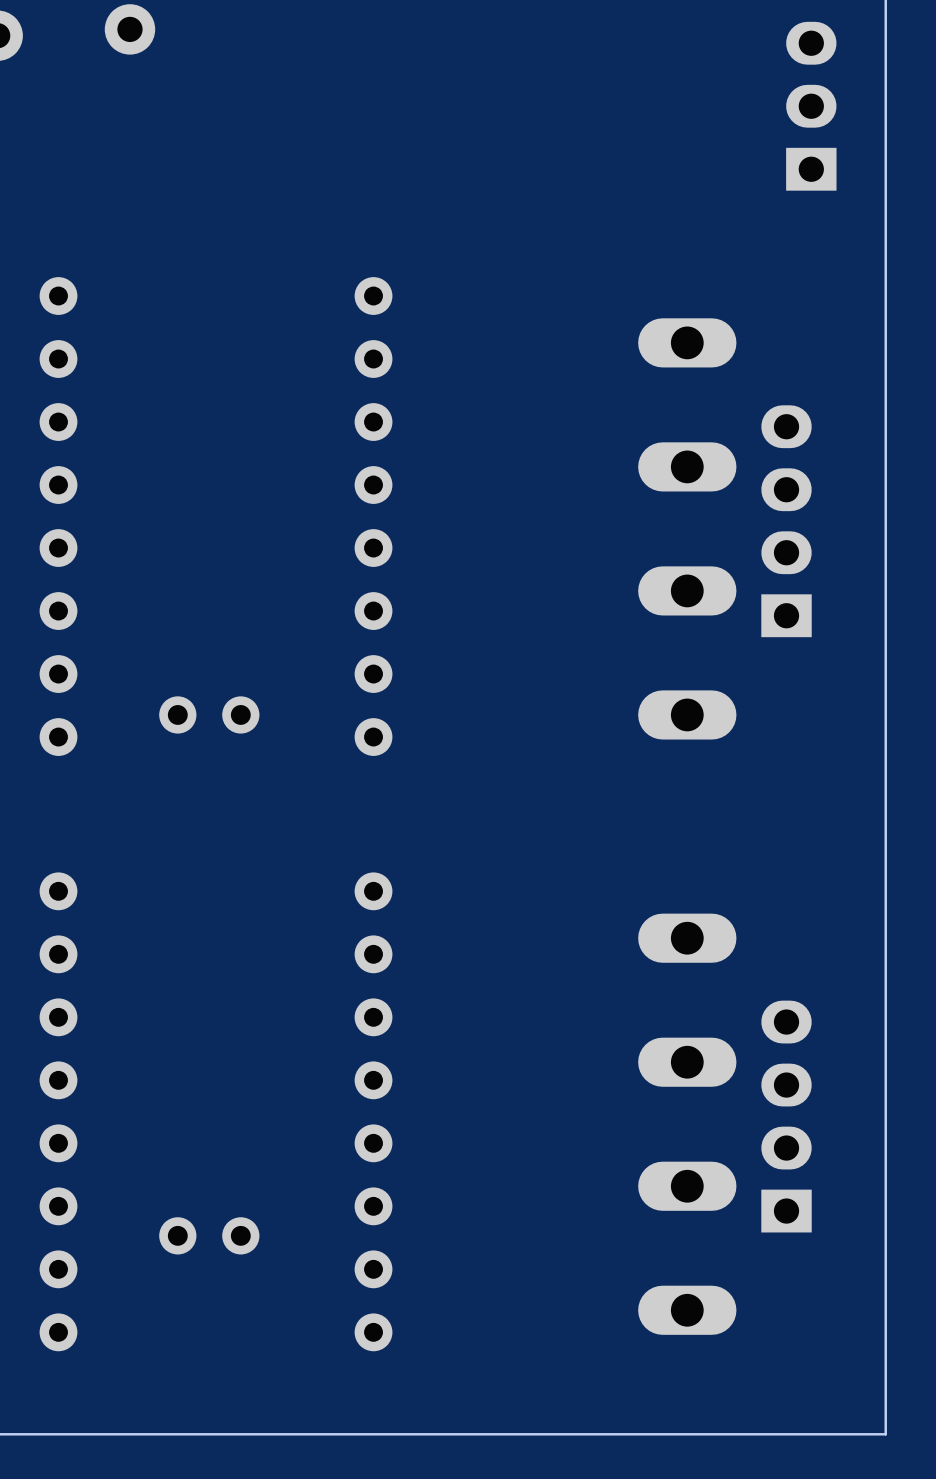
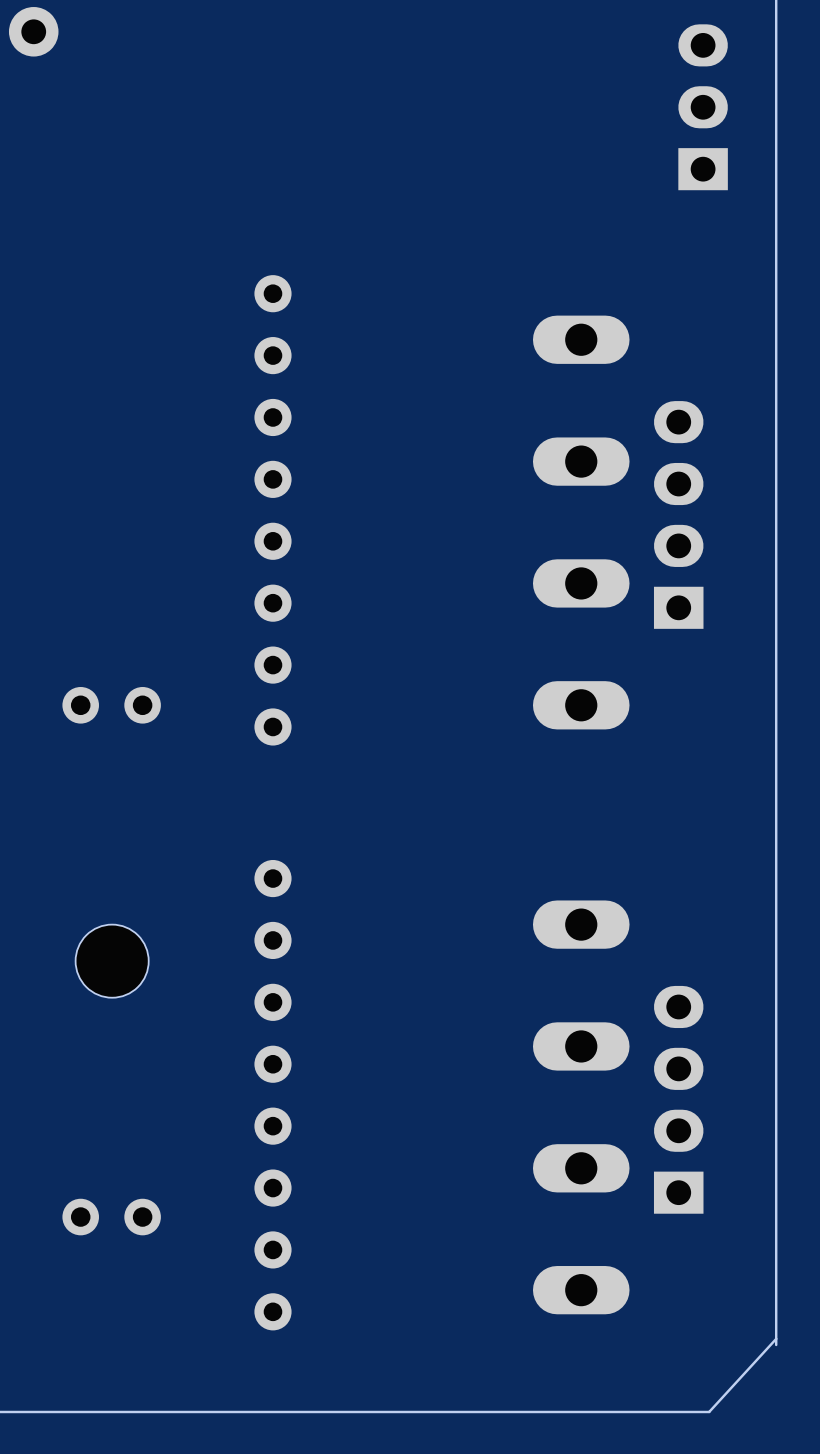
part: none -> (112, 961)
board edge: (885, 1366) (885, 1434) (817, 1434) -> (776, 1338) (709, 1411)

